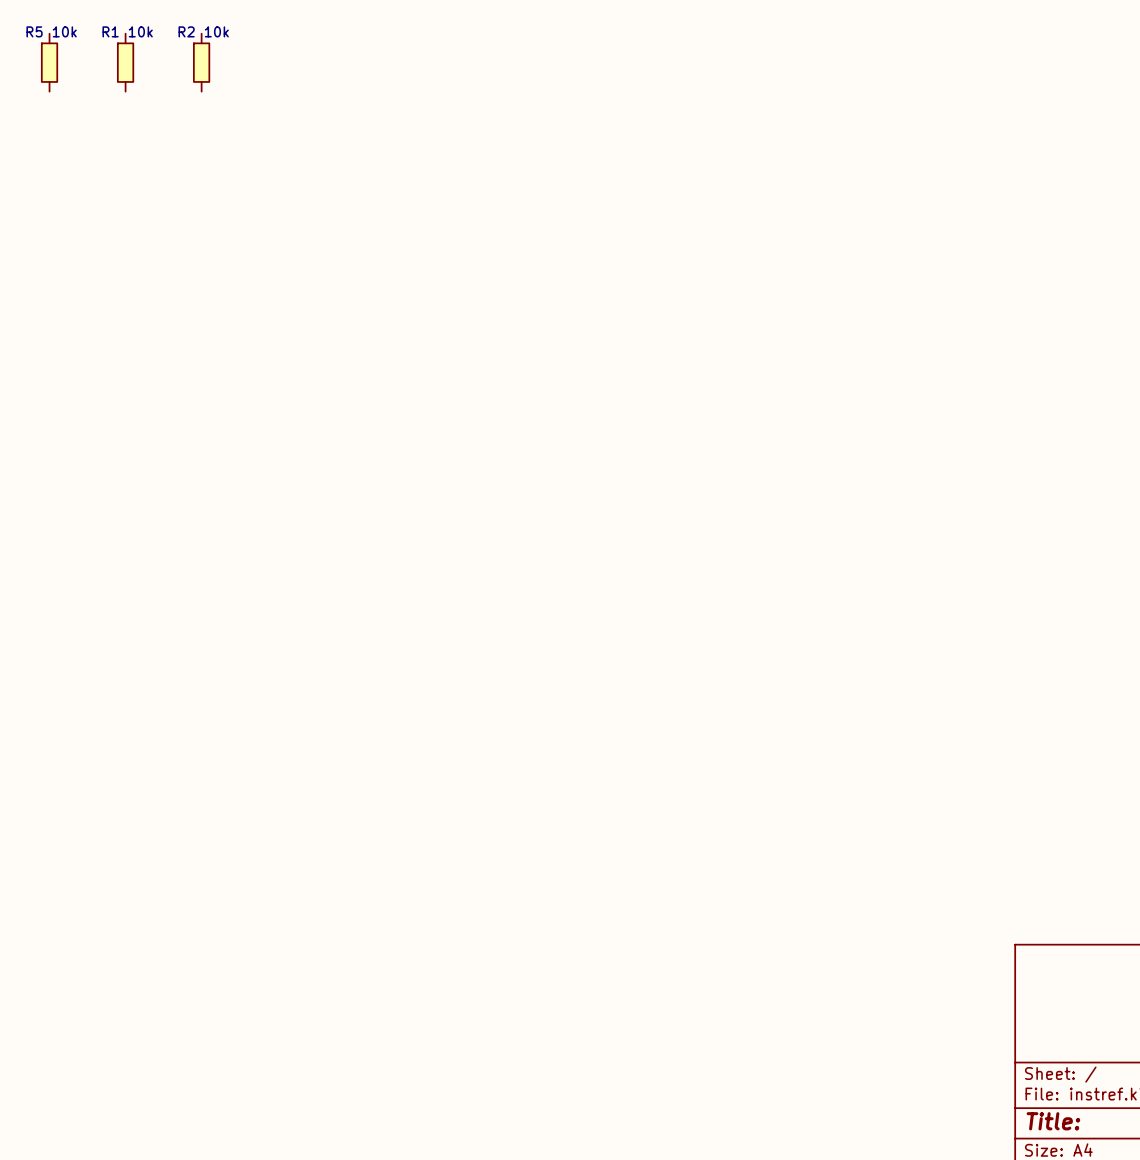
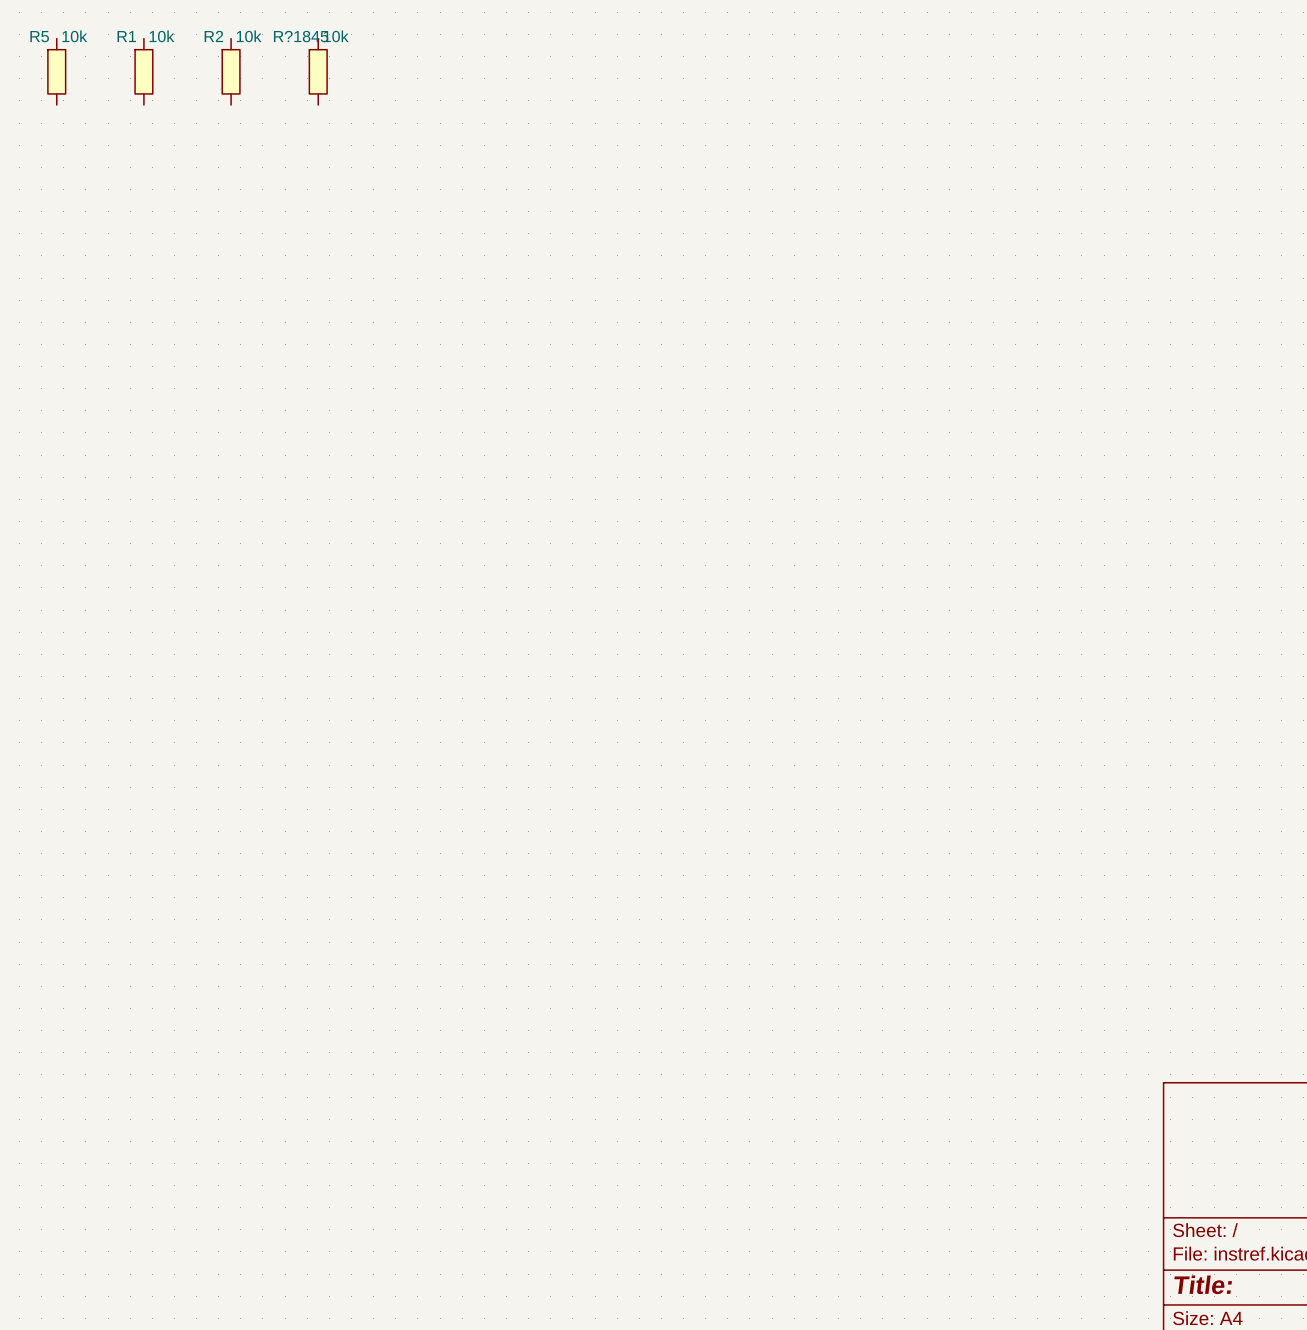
R?1845: none -> 10k (318, 71)

